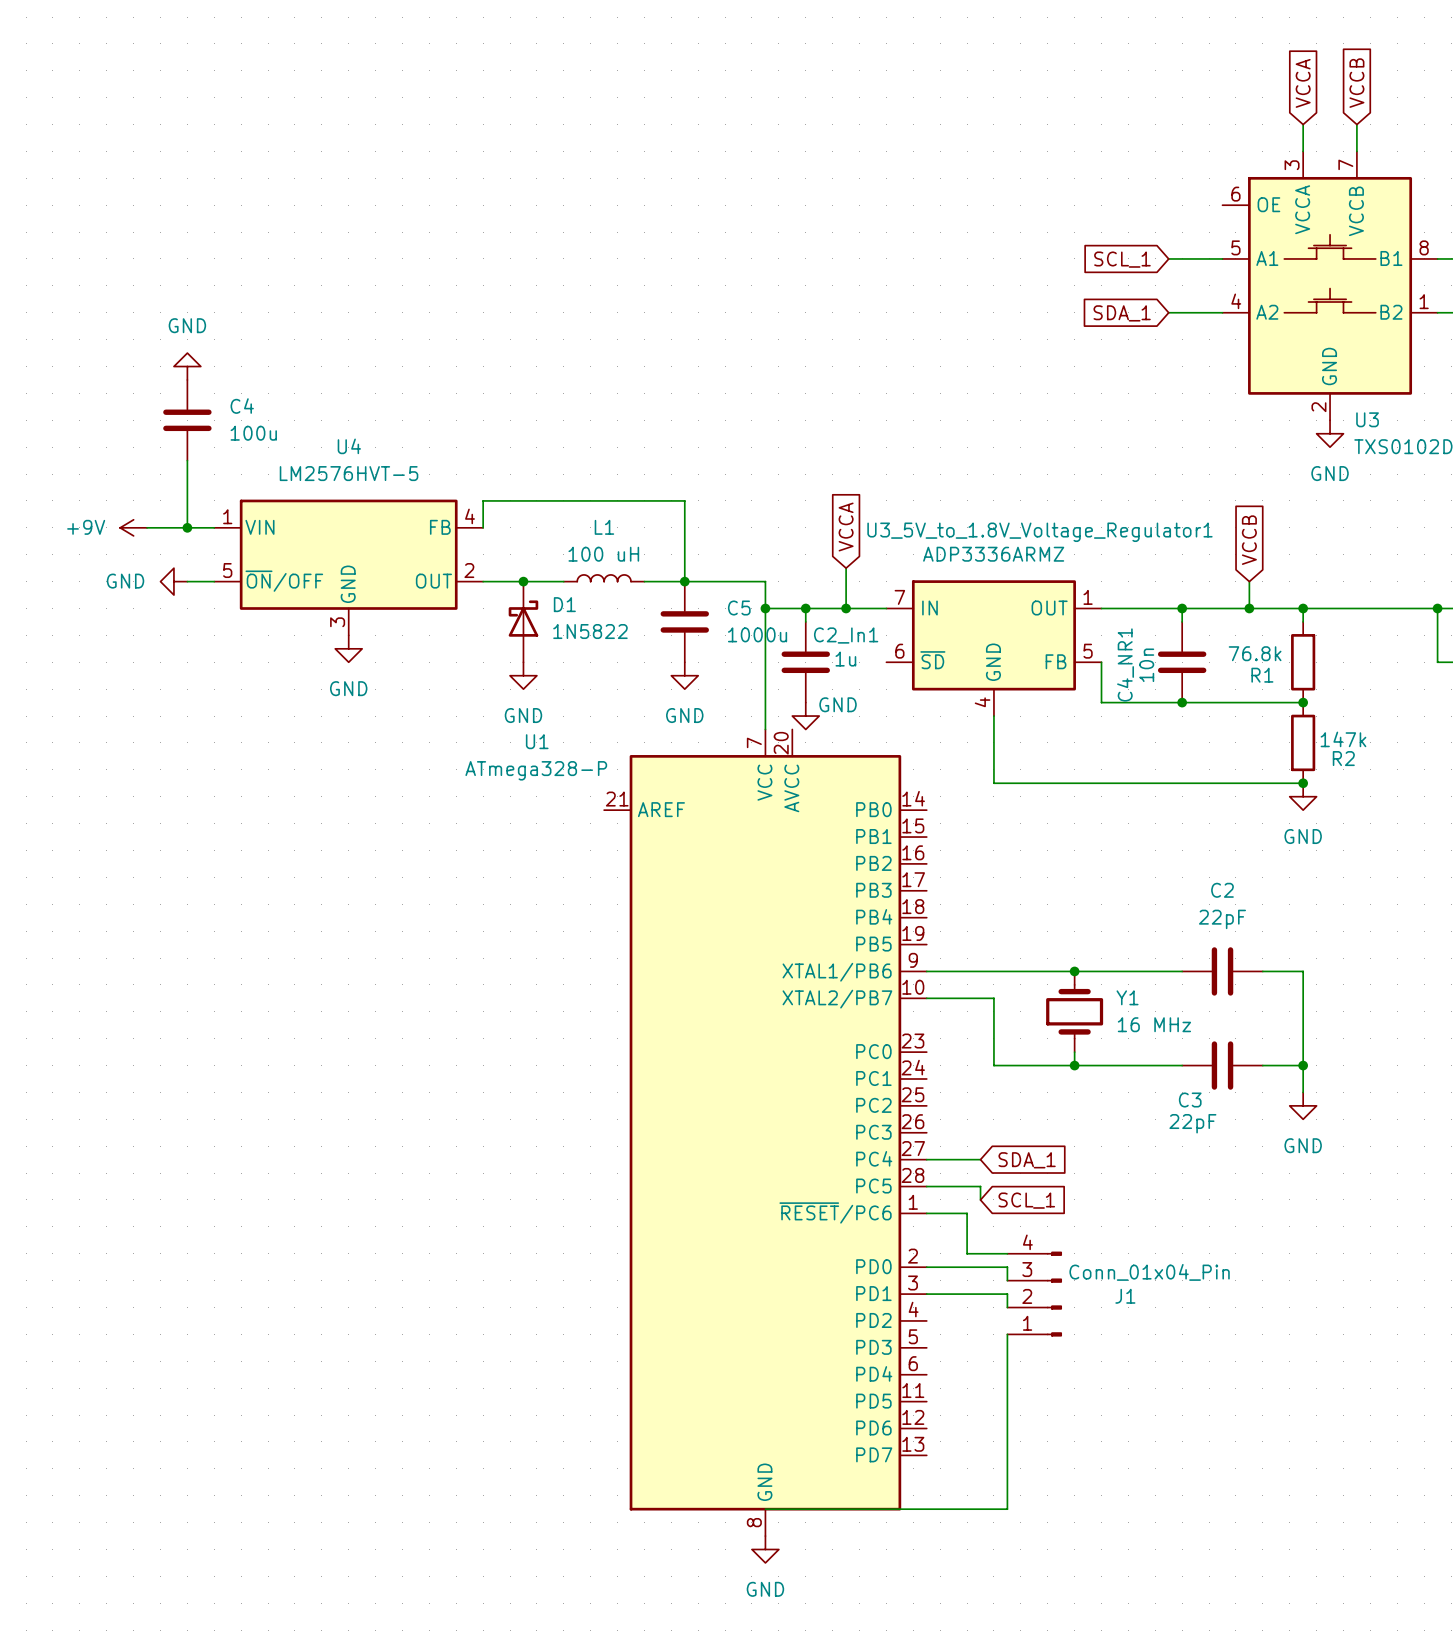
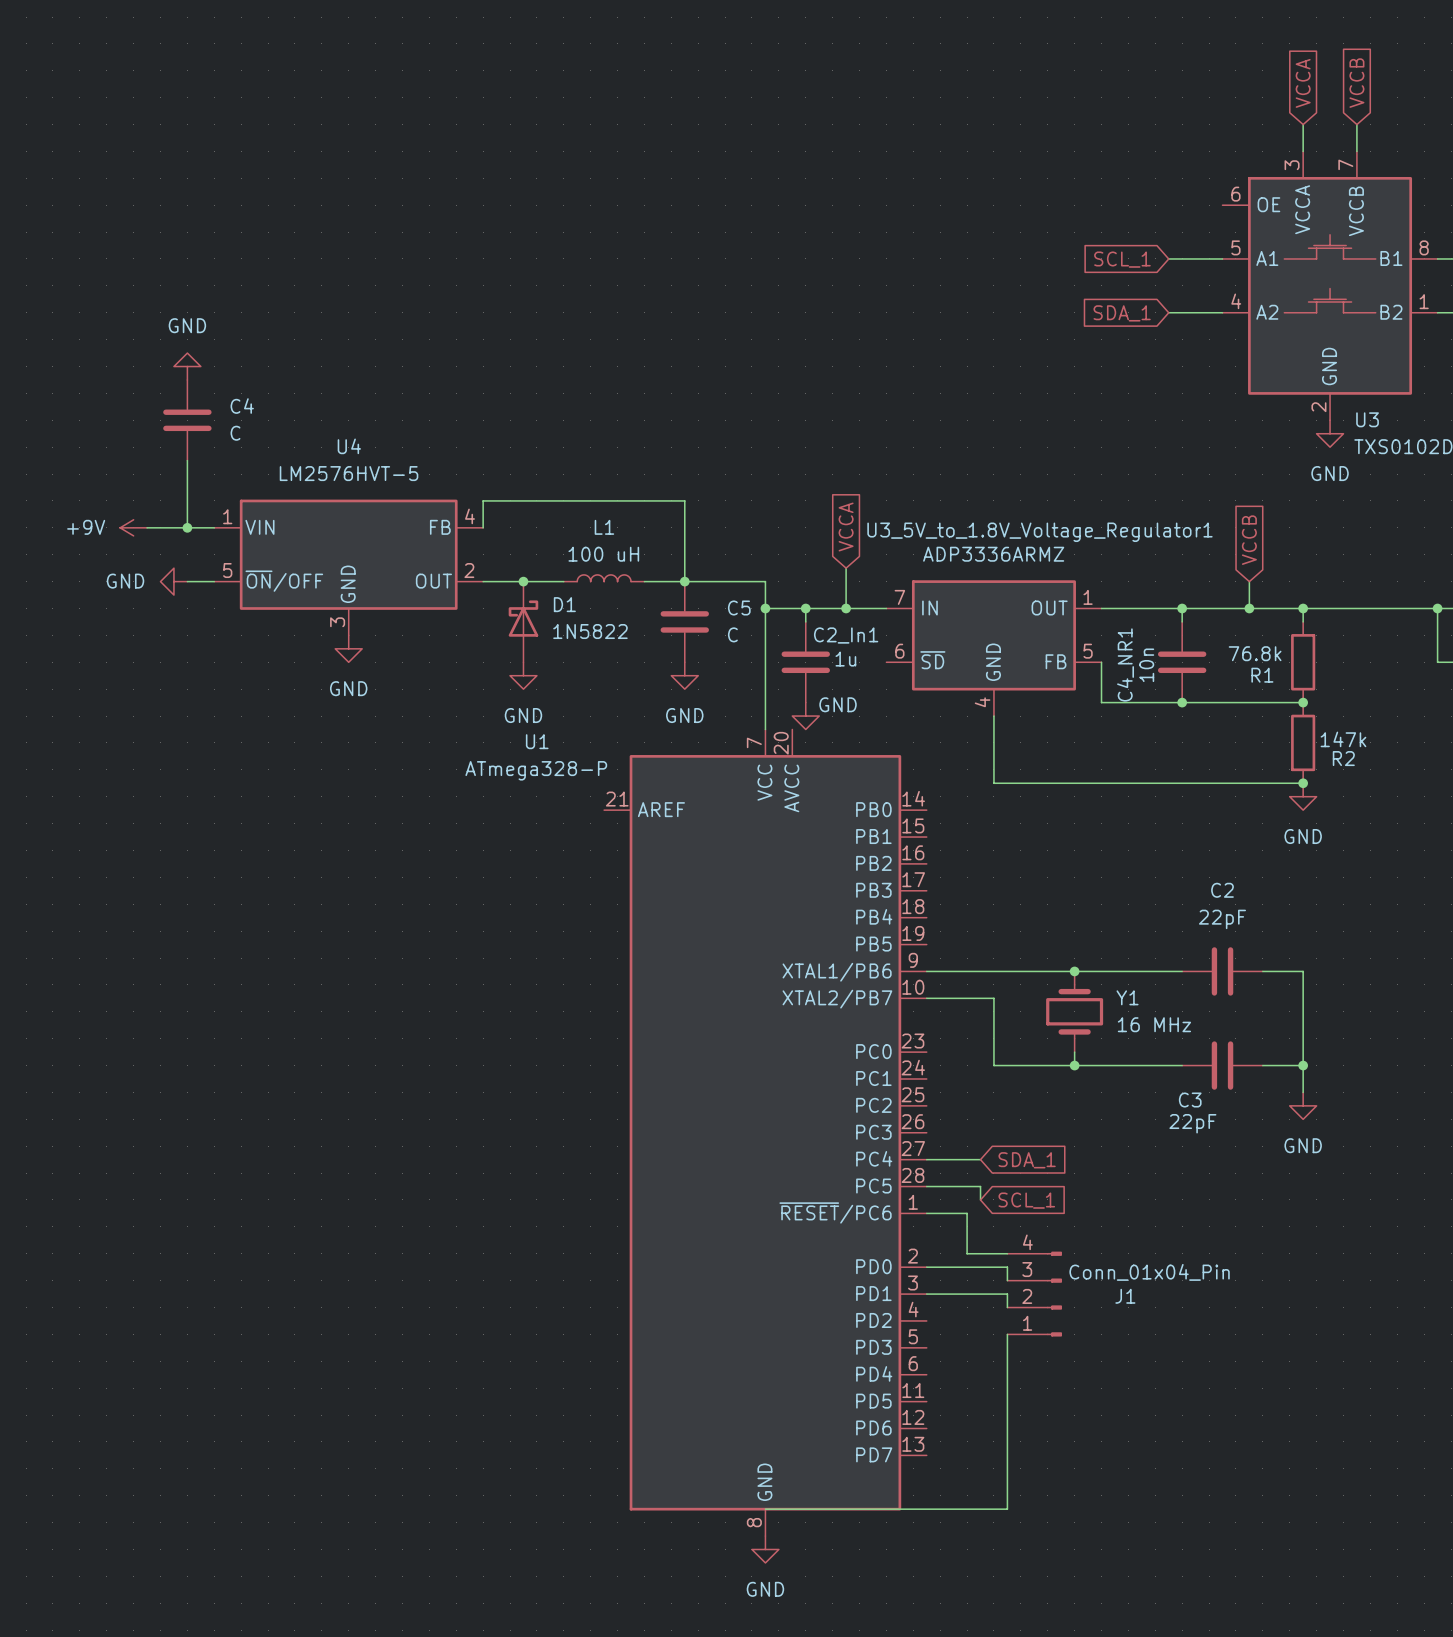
C4 value: 100u (253, 433) -> C (235, 433)
C5 value: 1000u (757, 634) -> C (732, 634)

